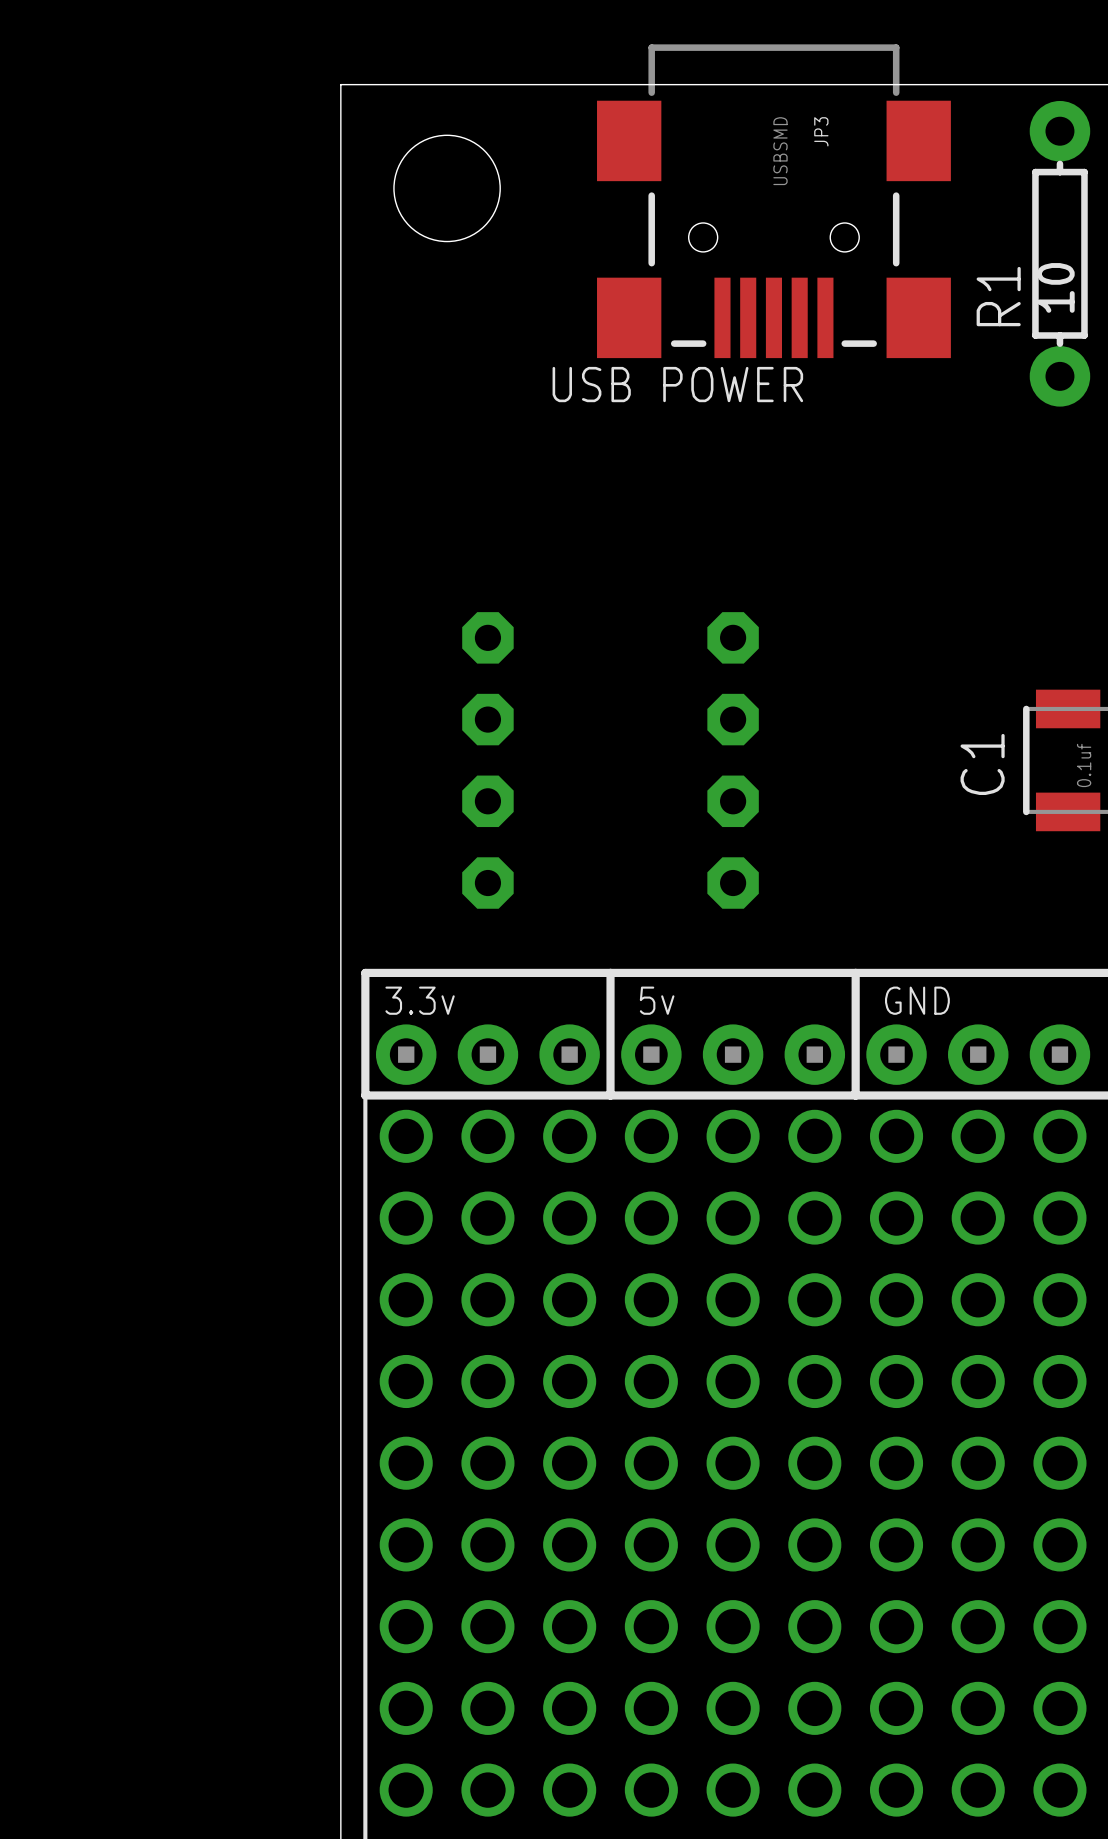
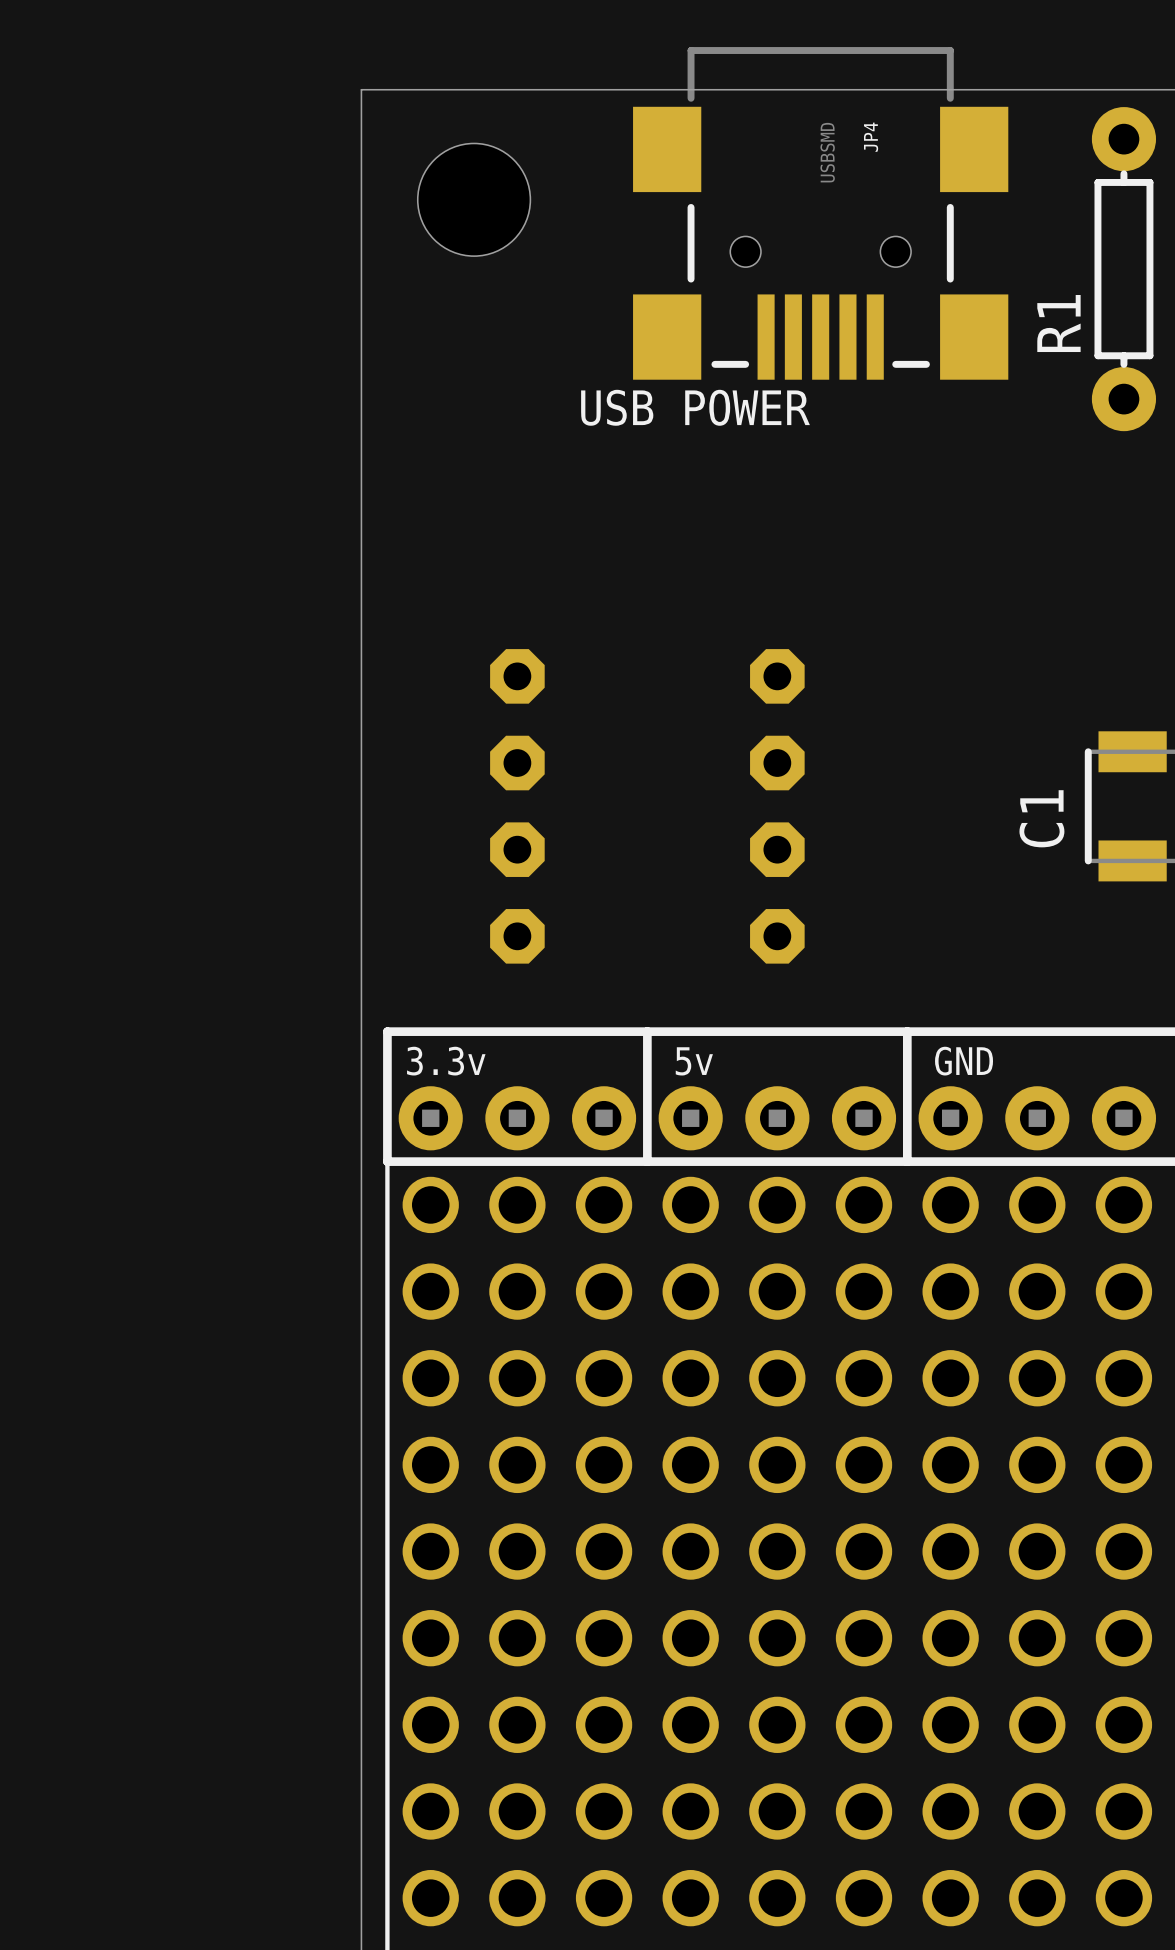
JP3 name: JP3 (821, 131) -> JP4 (871, 137)
R1 value: 10 (1055, 287) -> none
C1 value: 0.1uf (1084, 765) -> none

